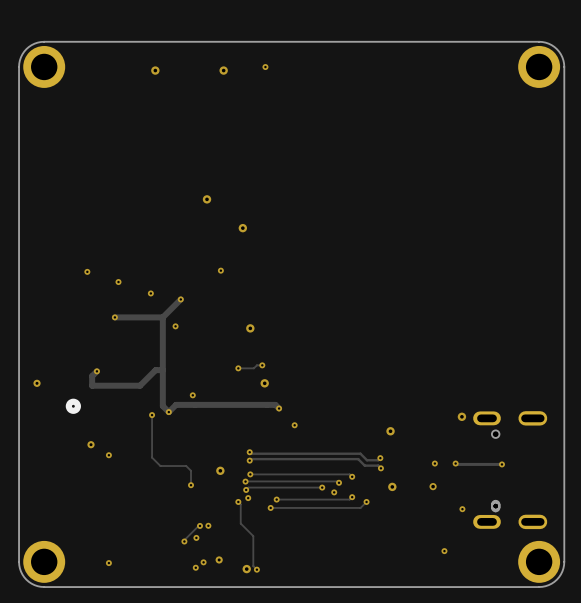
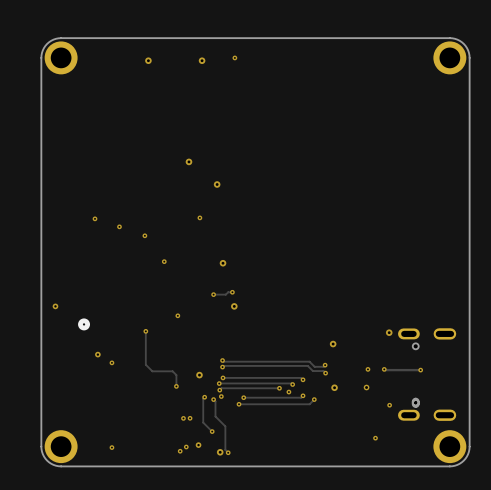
track: (180, 299) (162, 317) -> none
via: (180, 299) -> none
via: (114, 317) -> none
track: (162, 317) (162, 406) (168, 412) (176, 404) (275, 404) (279, 408) -> none
track: (162, 317) (114, 317) -> none
track: (162, 370) (155, 370) (140, 385) (92, 385) (92, 376) (96, 371) -> none
via: (96, 371) -> none
via: (279, 408) -> none
via: (168, 412) -> none
via: (294, 425) -> none
track: none -> (204, 397) (203, 422) (212, 431)
via: none -> (204, 397)
track: (199, 525) (184, 541) -> none
via: (196, 537) -> none
via: (184, 541) -> none
via: none -> (212, 431)

